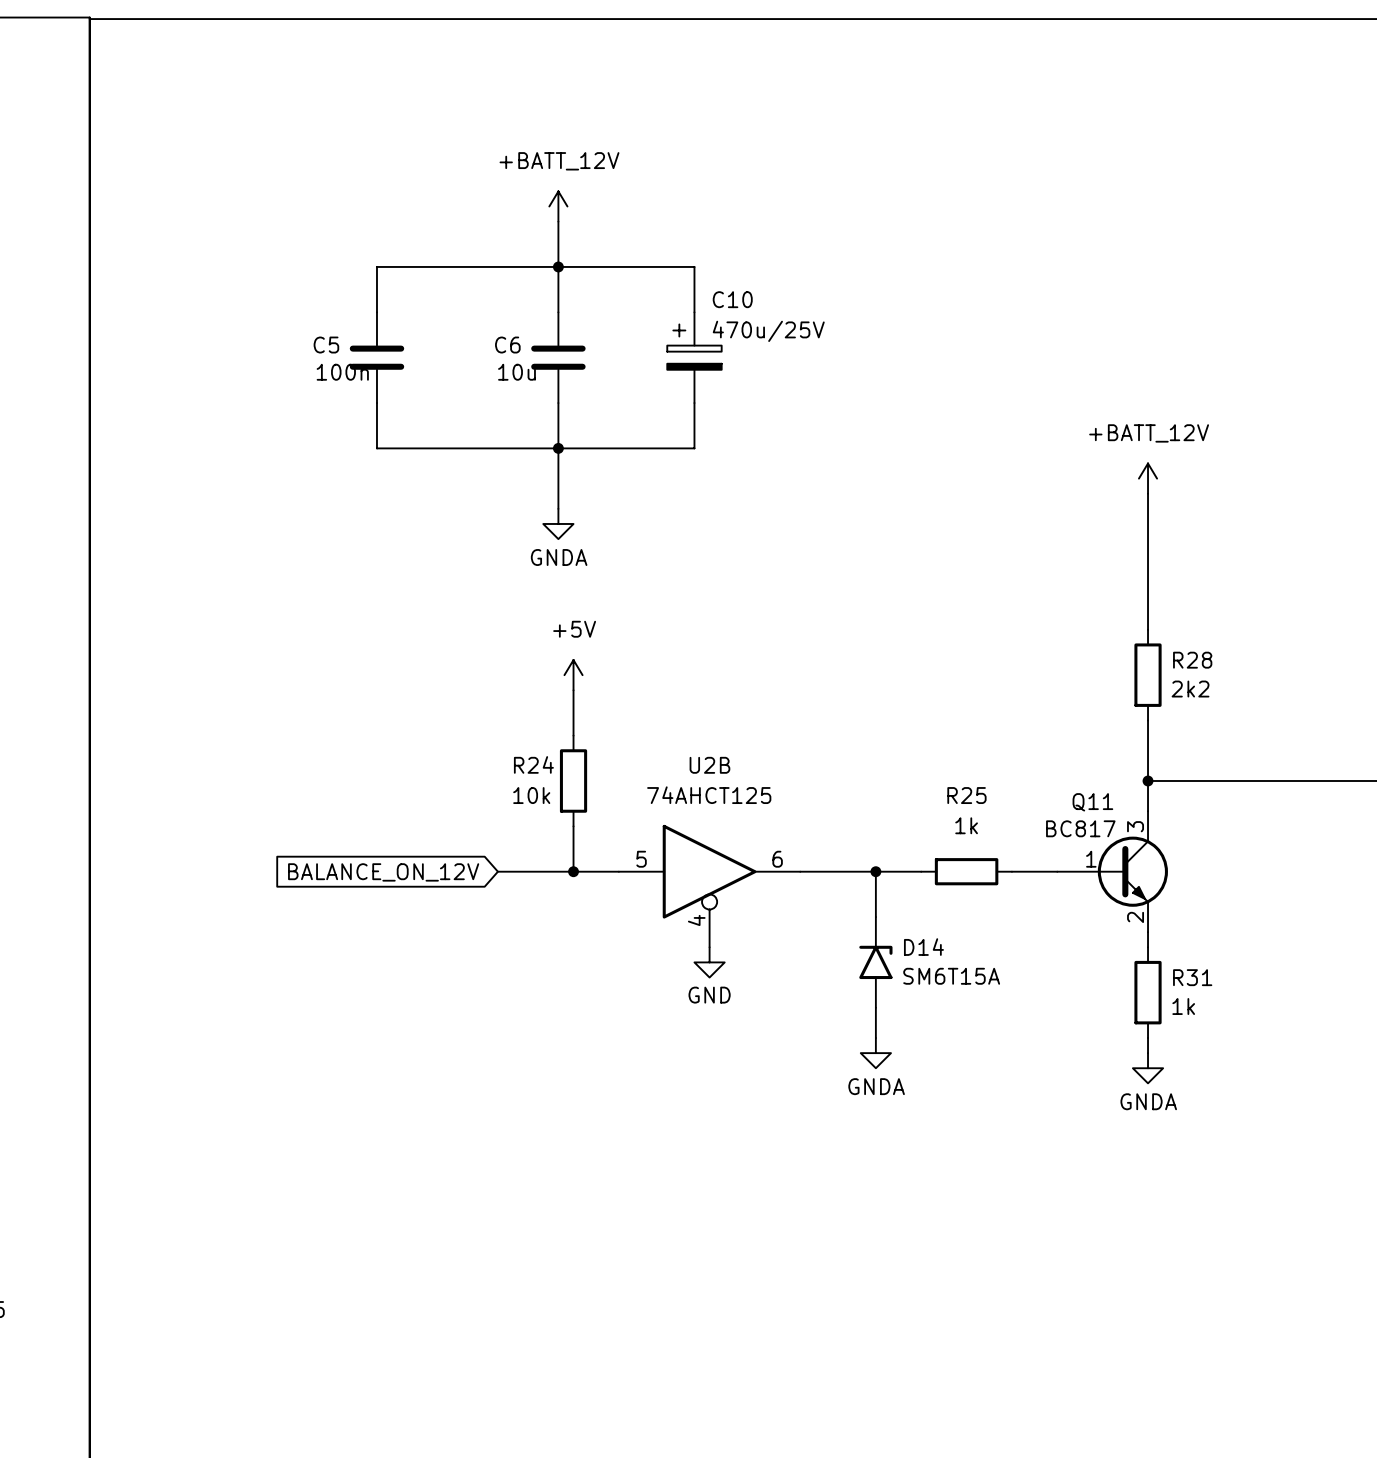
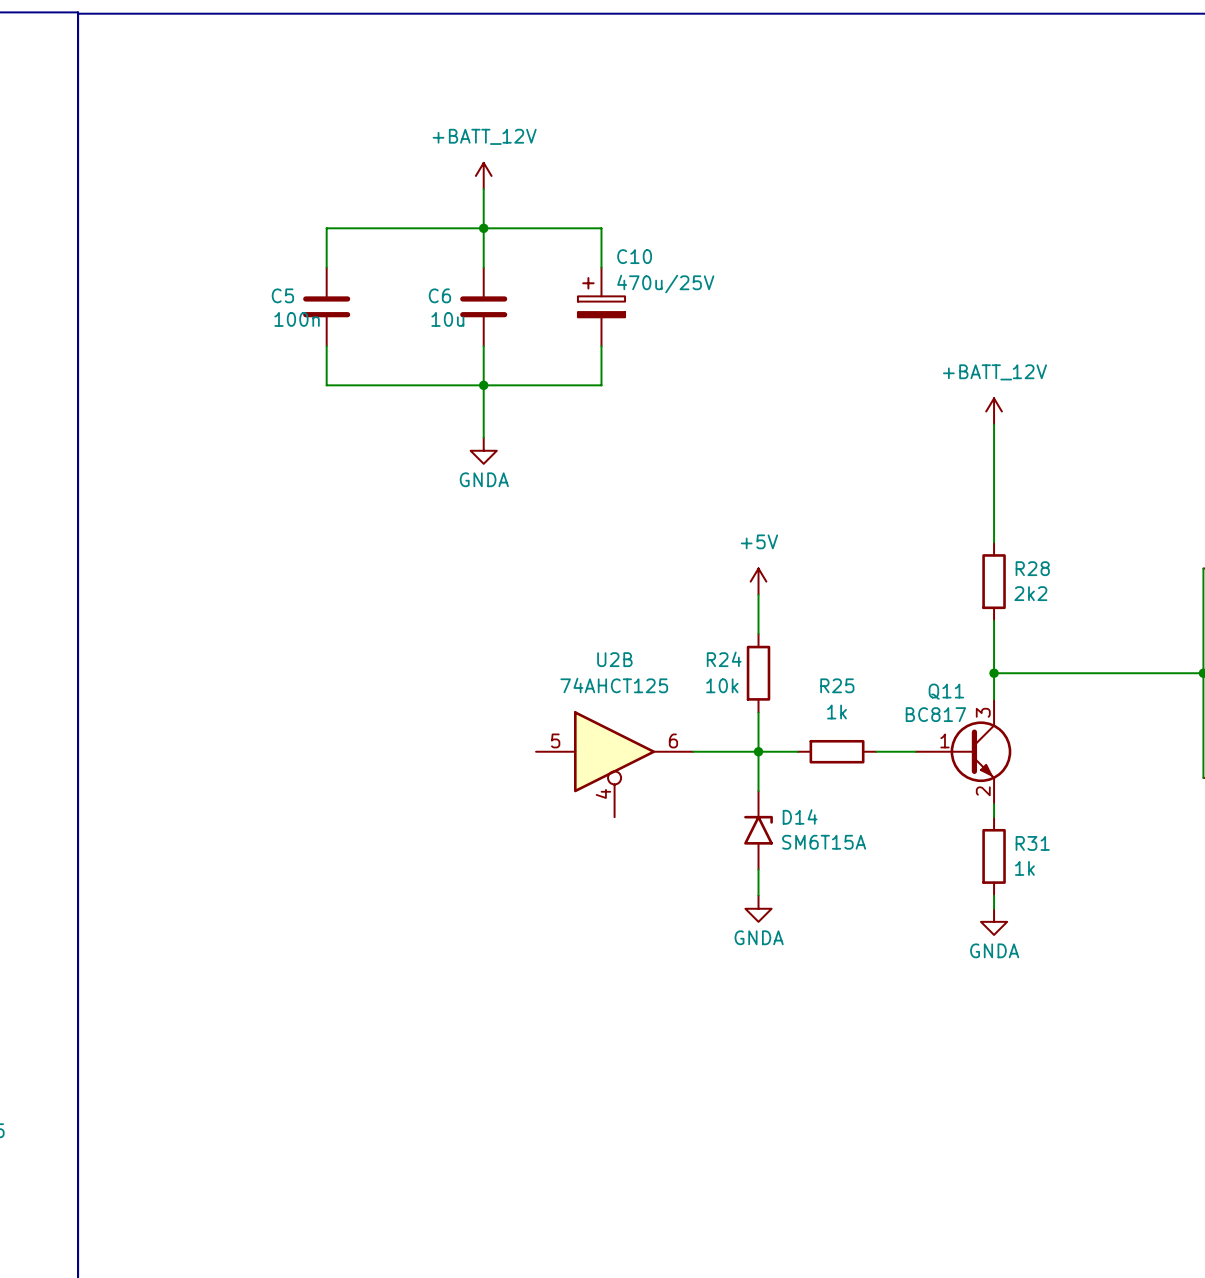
power symbol: +5V (573, 675) -> none
power symbol: none -> +5V (758, 581)
wire: (573, 690) (573, 735) -> none
wire: none -> (758, 594) (758, 633)
R24 position: (573, 780) -> (758, 673)
wire: (573, 826) (573, 871) -> none
wire: none -> (758, 712) (758, 751)
wire: (497, 871) (618, 871) -> none
junction: (573, 871) -> none
global label: BALANCE_ON_12V (383, 872) -> none
power symbol: GND (709, 962) -> none

